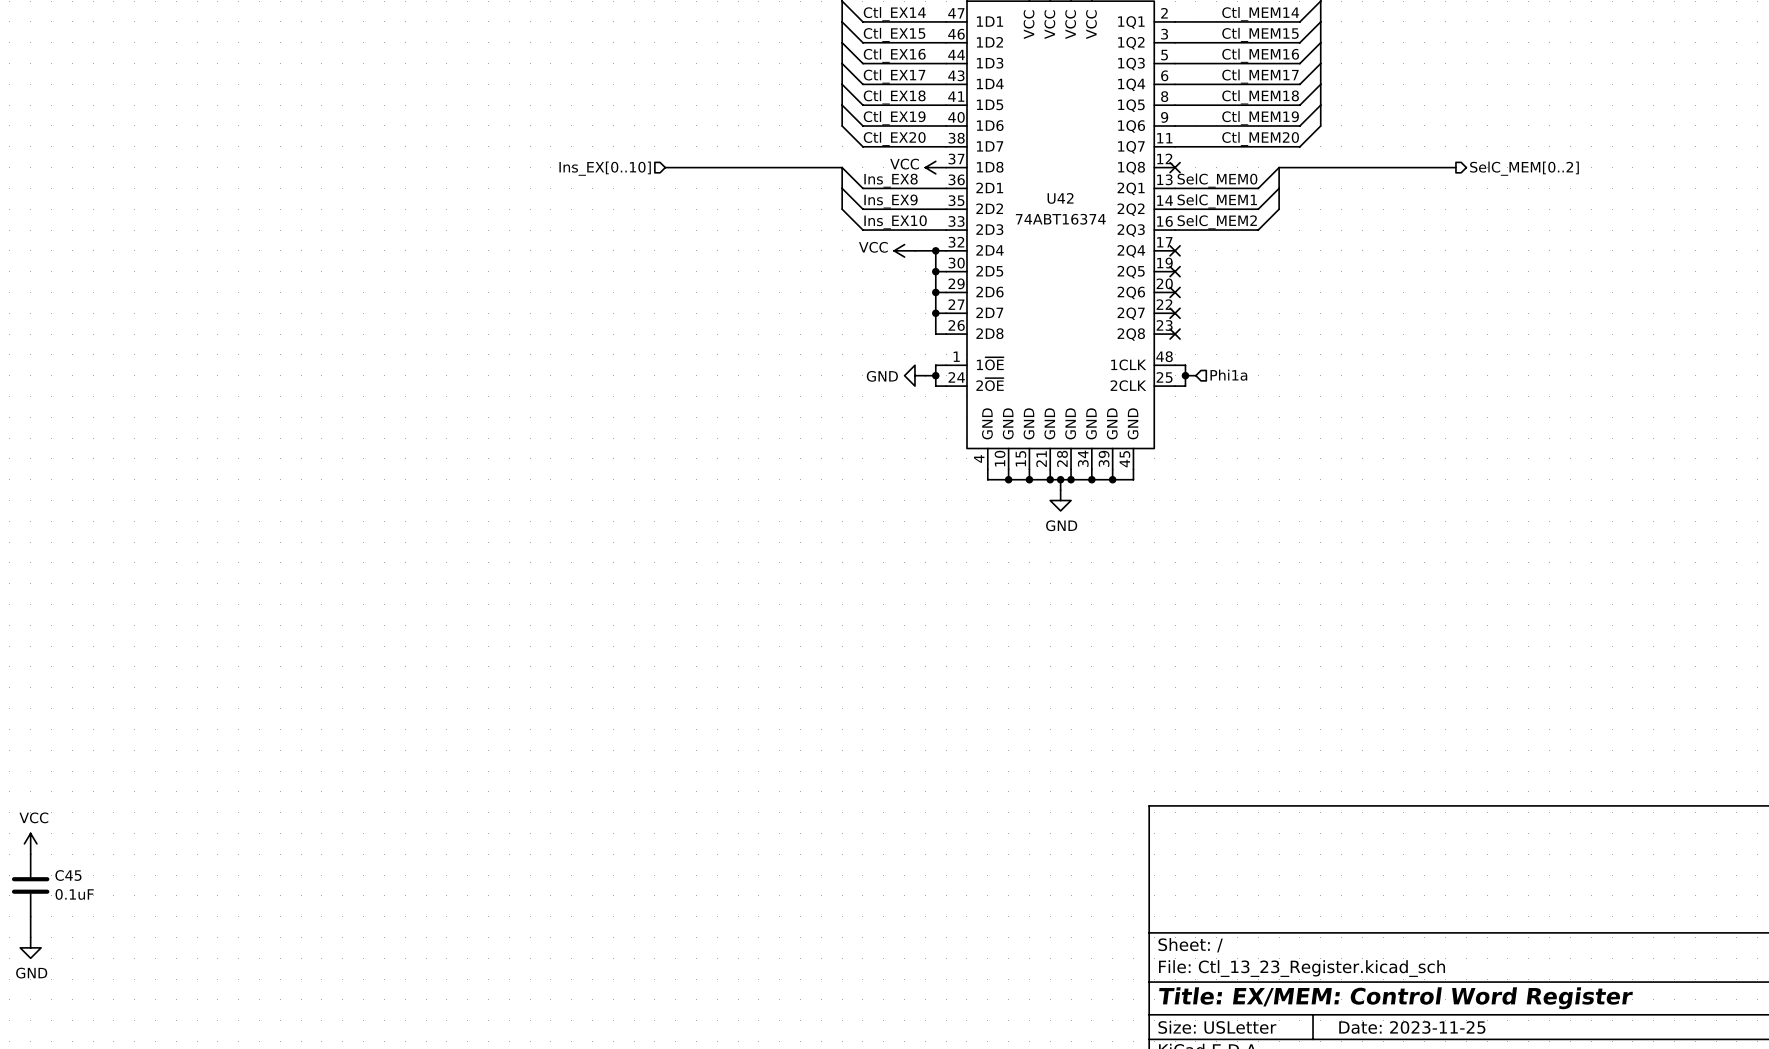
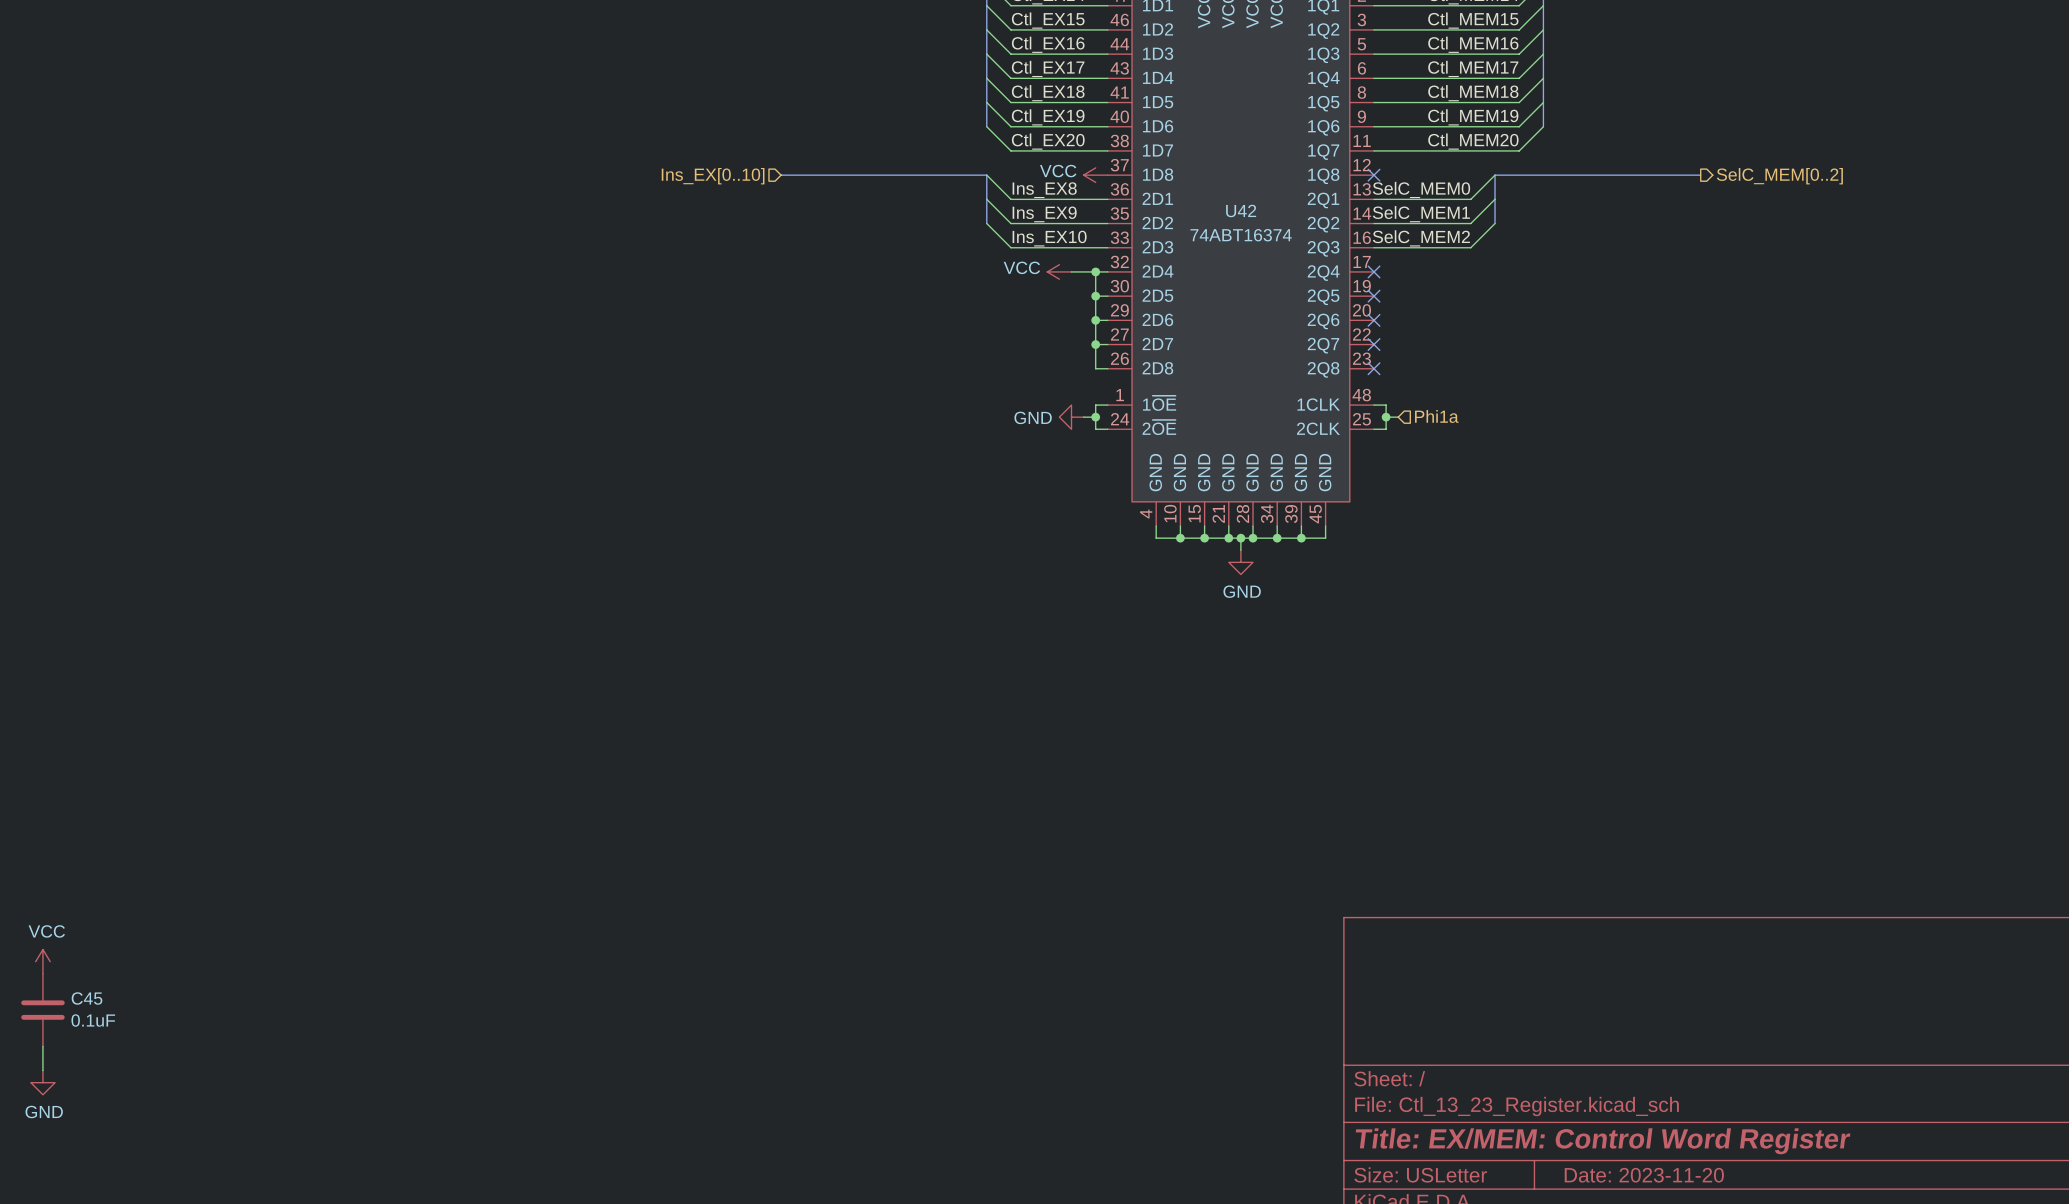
title block: Date: 2023-11-25 (1412, 1027) -> Date: 2023-11-20 (1644, 1175)

